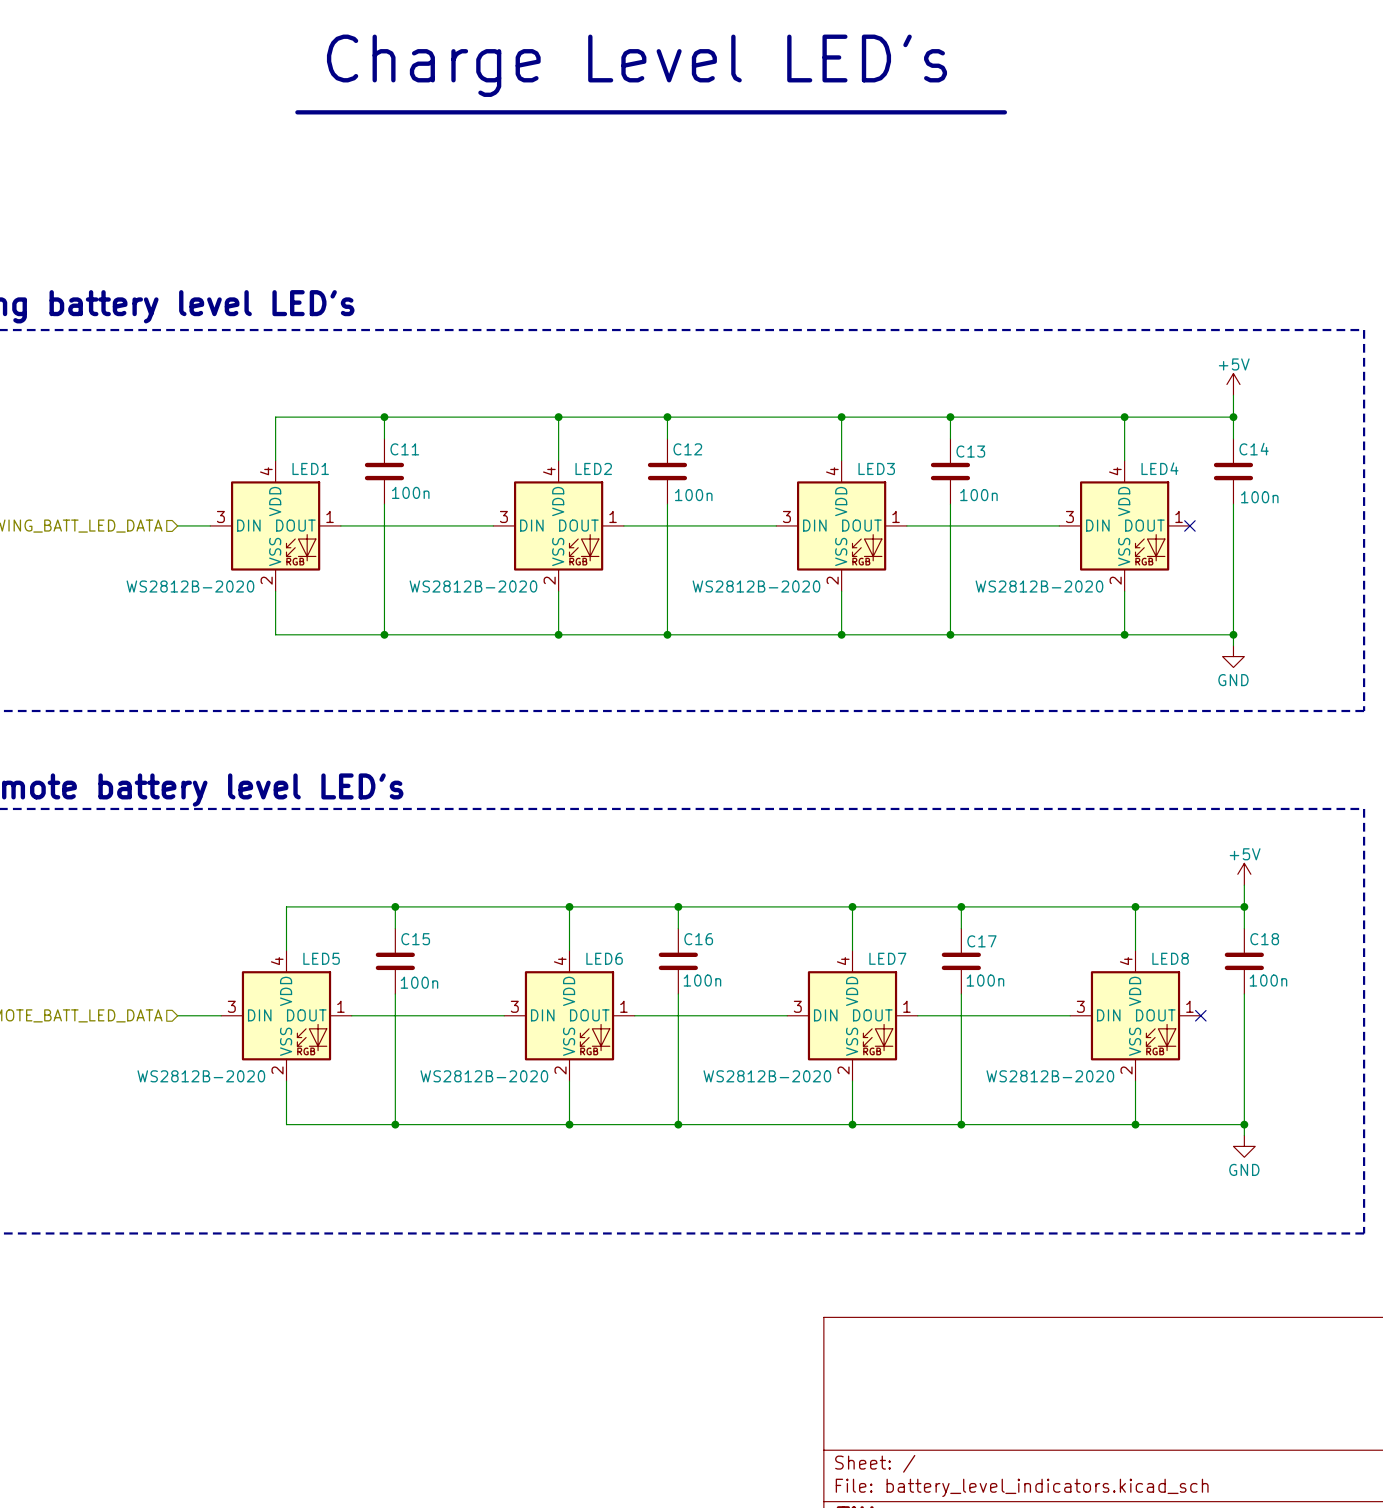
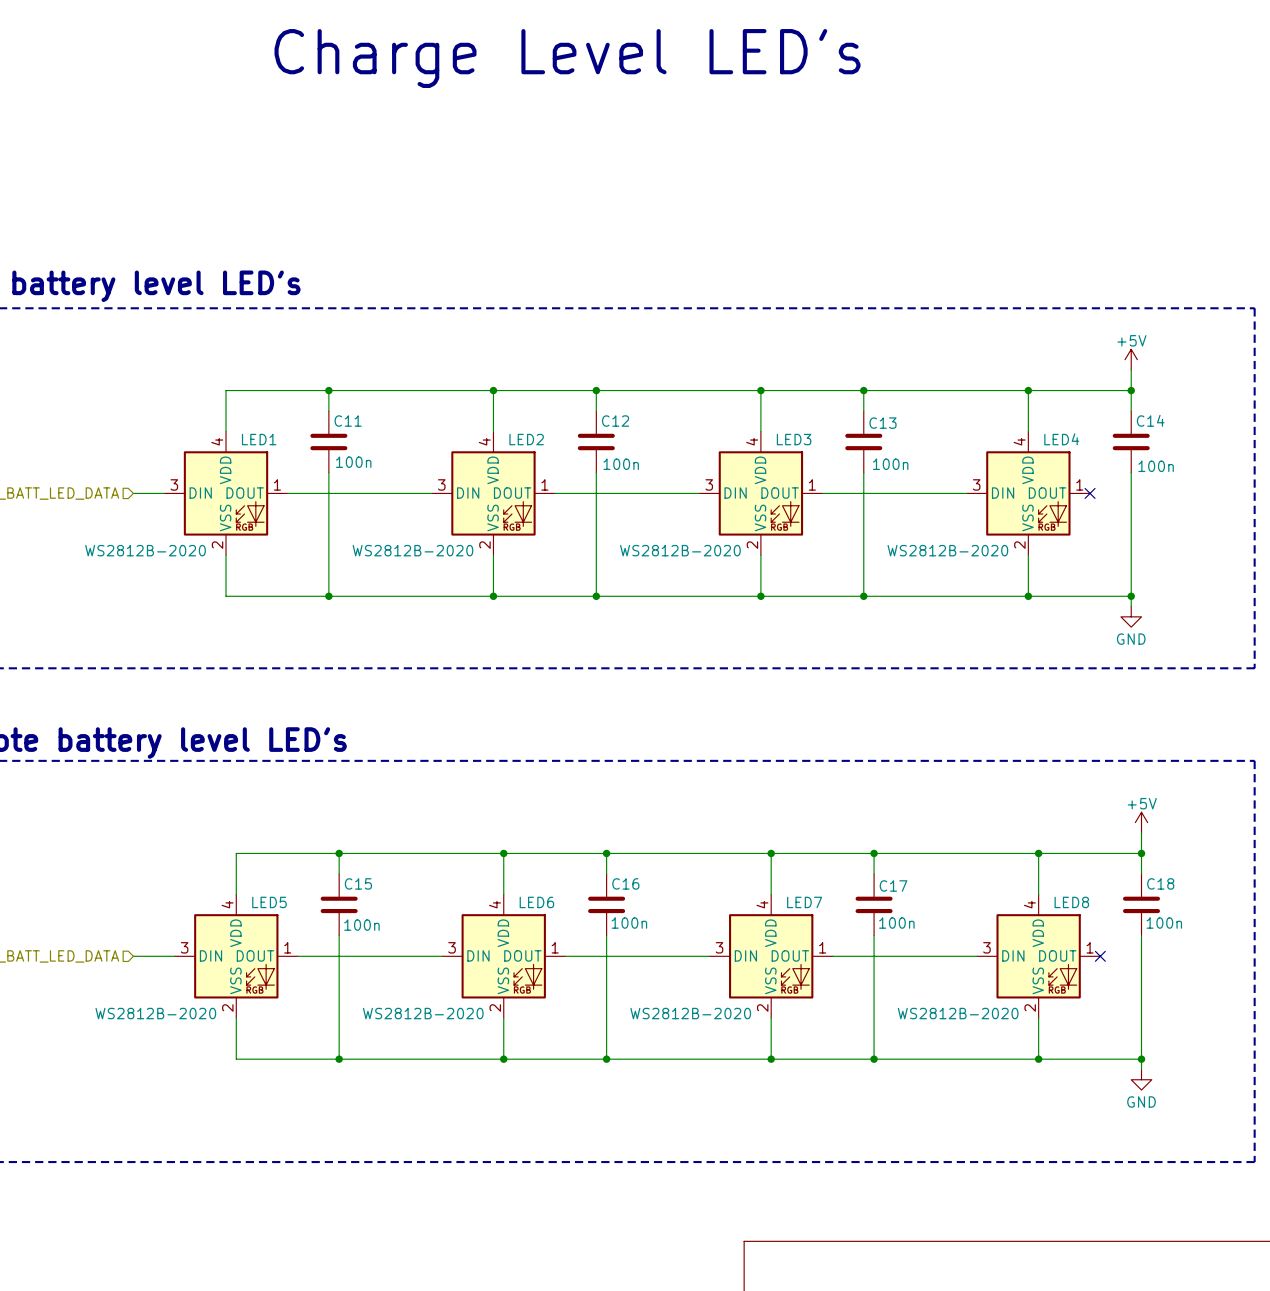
line: (297, 112) (1004, 112) -> none

